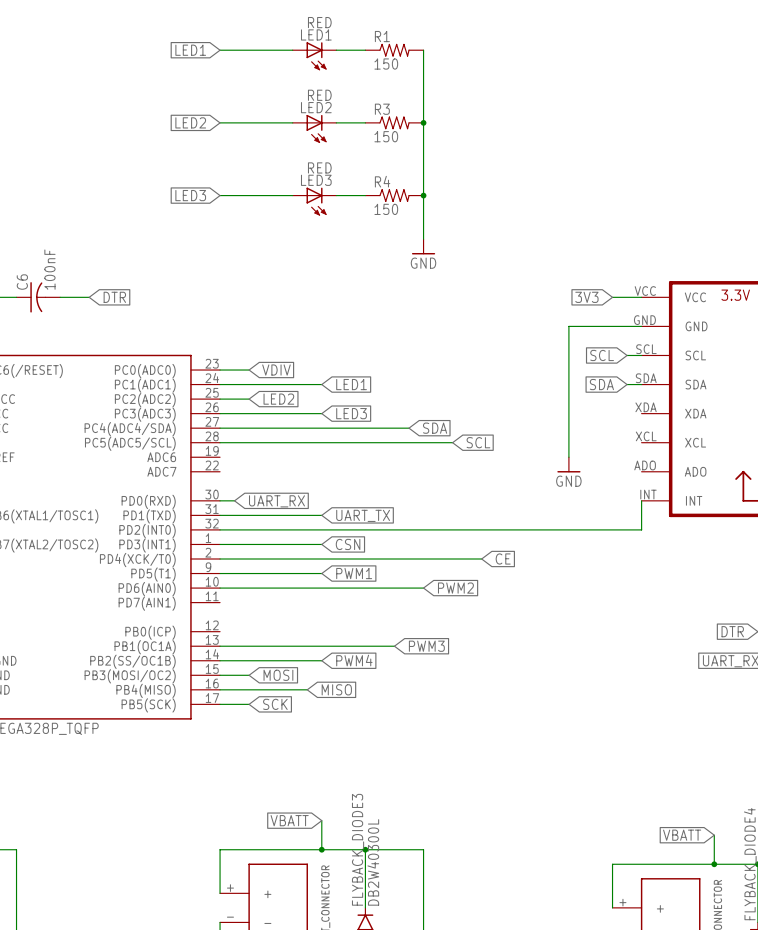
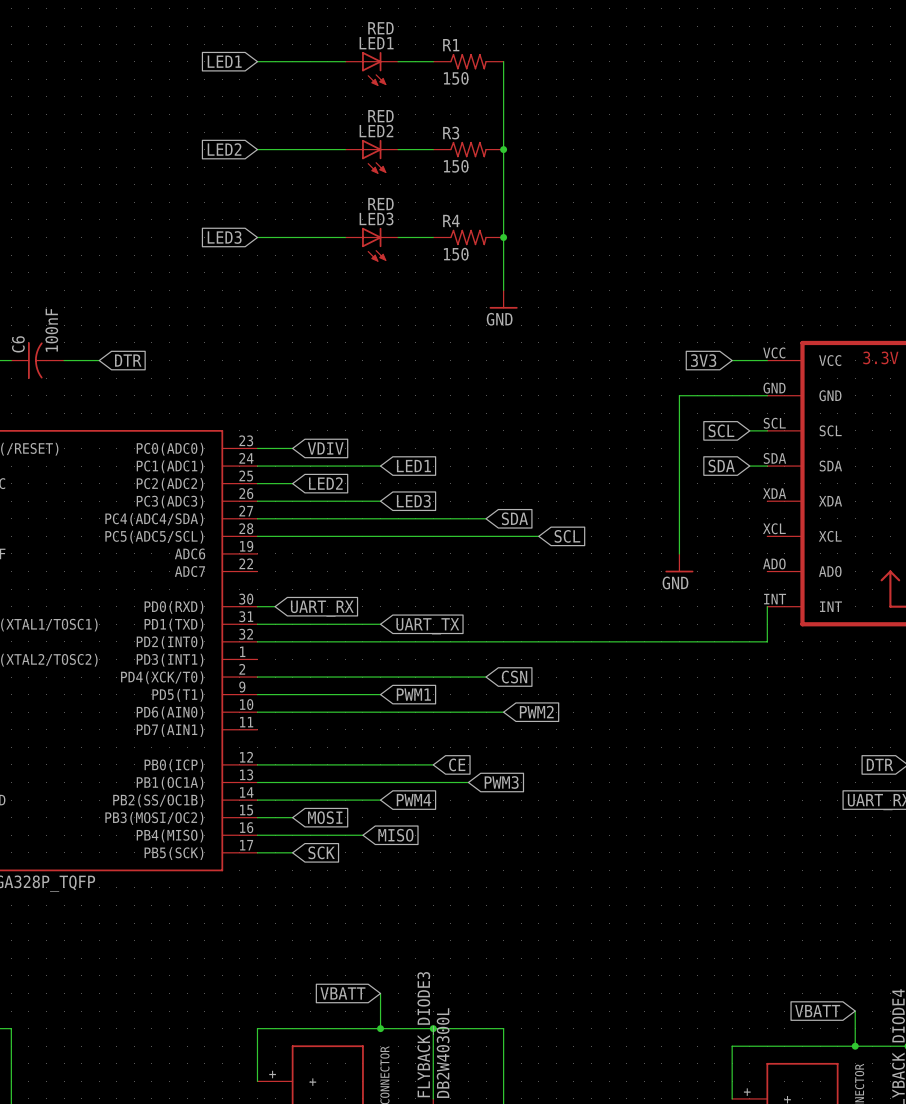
wire: (220, 544) (321, 544) -> none
global label position: CSN (348, 544) -> CSN (514, 677)
wire: (409, 558) (481, 558) -> none
global label position: CE (503, 558) -> CE (457, 764)
wire: none -> (257, 764) (433, 764)

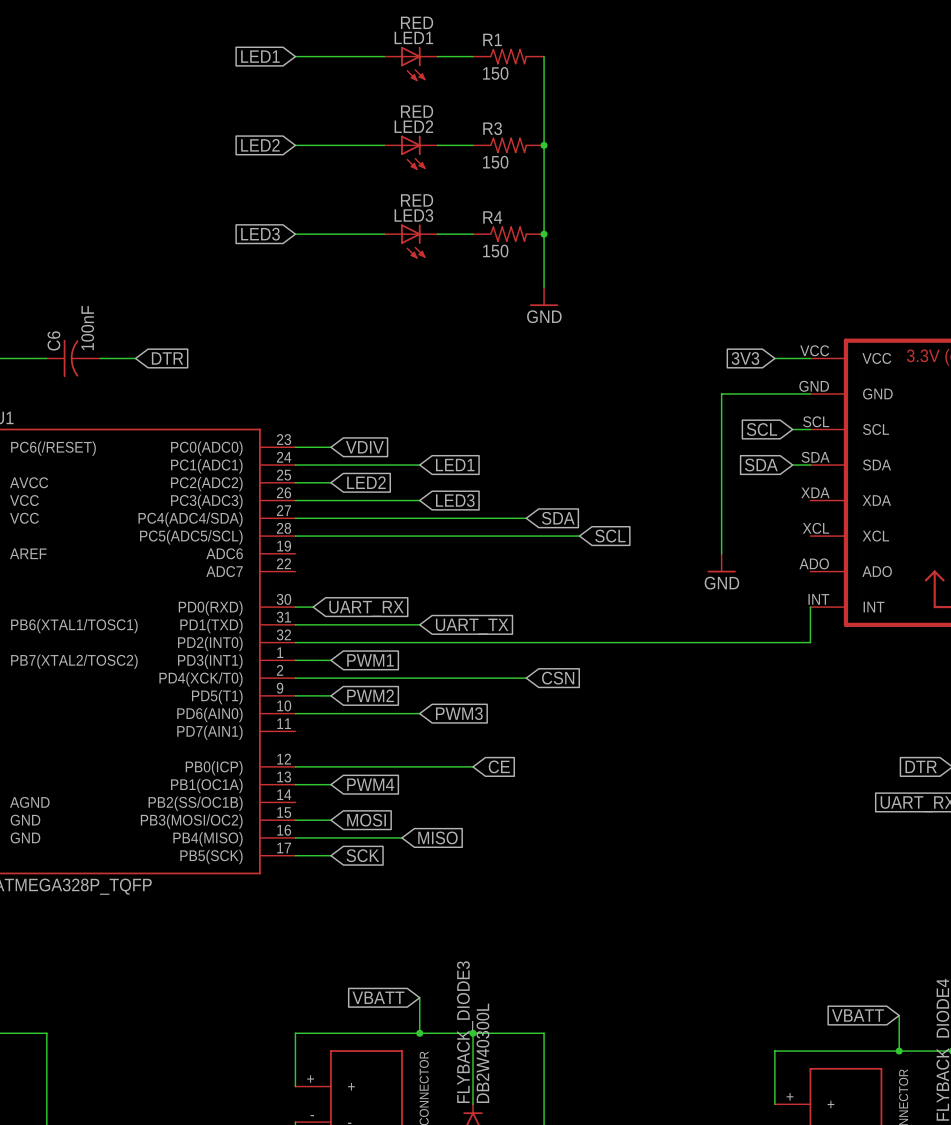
wire: none -> (295, 660) (330, 660)
wire: (292, 694) (380, 694) -> none
global label: none -> PWM2 (370, 695)
global label position: PWM1 (413, 694) -> PWM1 (370, 660)
wire: (380, 712) (503, 712) -> none
global label: PWM2 (536, 712) -> none
wire: (292, 782) (468, 782) -> none
global label position: PWM3 (501, 782) -> PWM3 (459, 713)
wire: (257, 800) (380, 800) -> none
global label position: PWM4 (413, 800) -> PWM4 (370, 784)

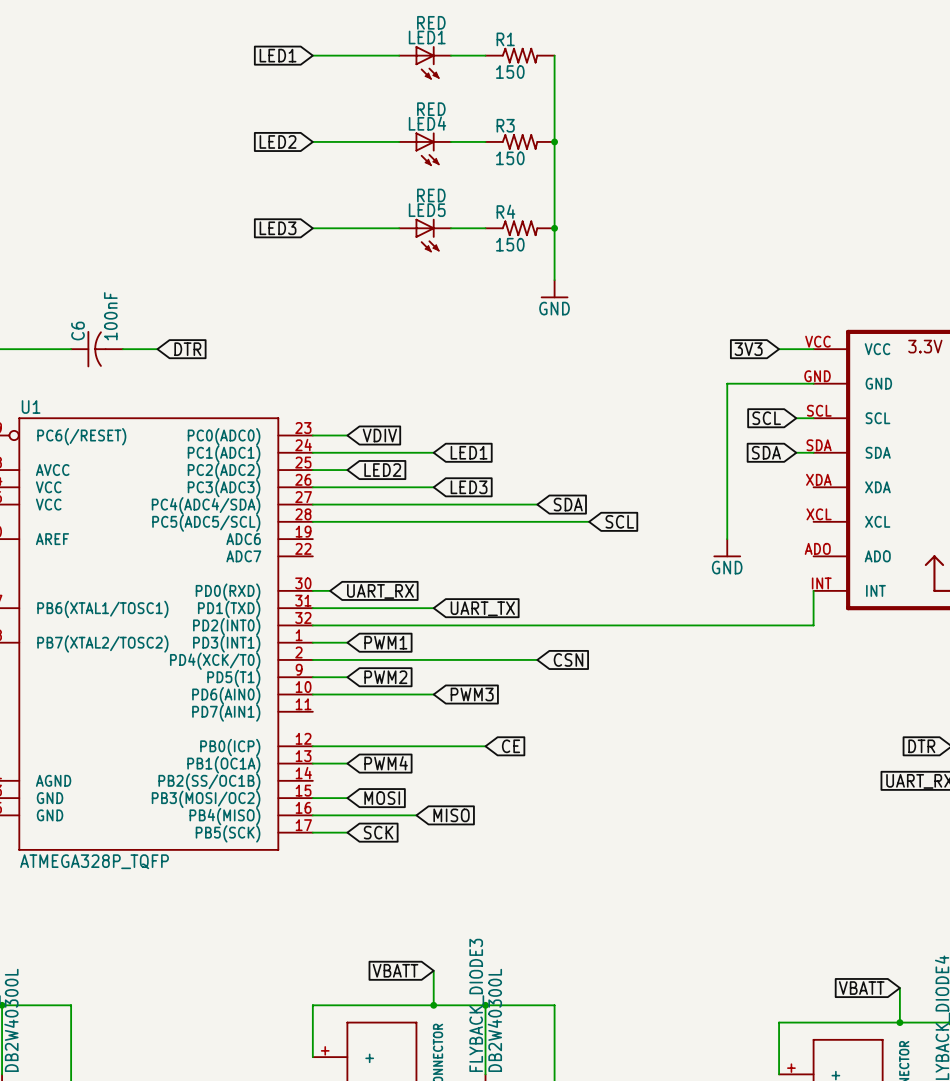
LED2 name: LED2 (413, 126) -> LED4 (427, 123)
LED3 name: LED3 (413, 215) -> LED5 (427, 210)

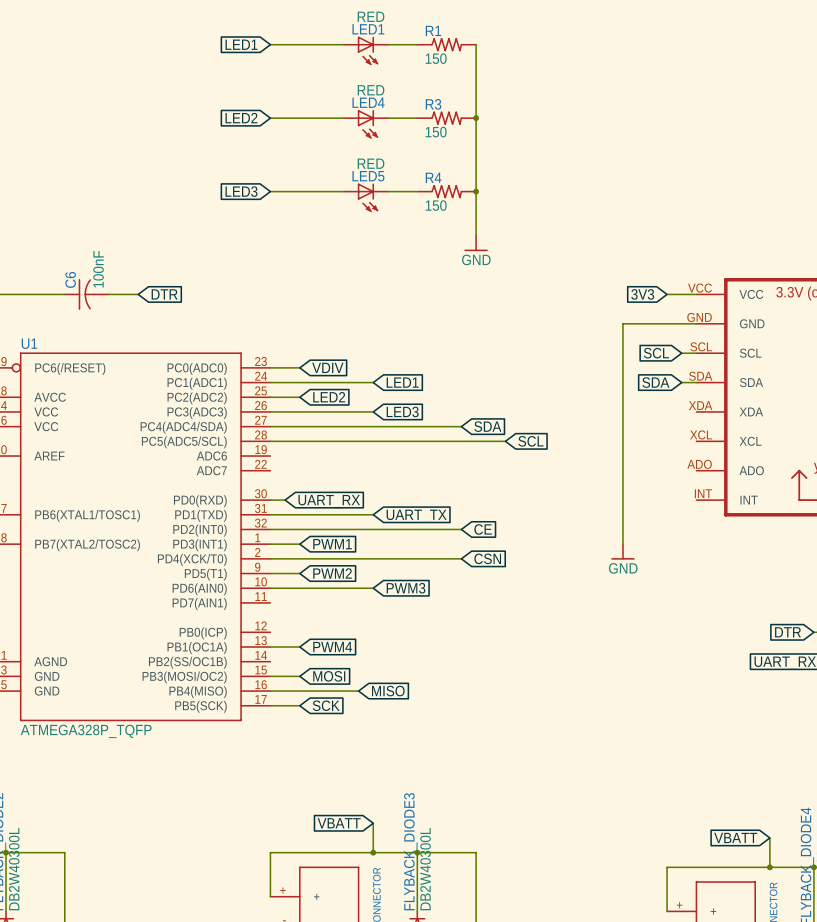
wire: none -> (622, 456) (622, 544)
power symbol position: GND (727, 548) -> GND (622, 551)
wire: (813, 590) (813, 625) (537, 625) -> none
wire: (312, 746) (485, 746) -> none
global label position: CE (511, 746) -> CE (483, 529)

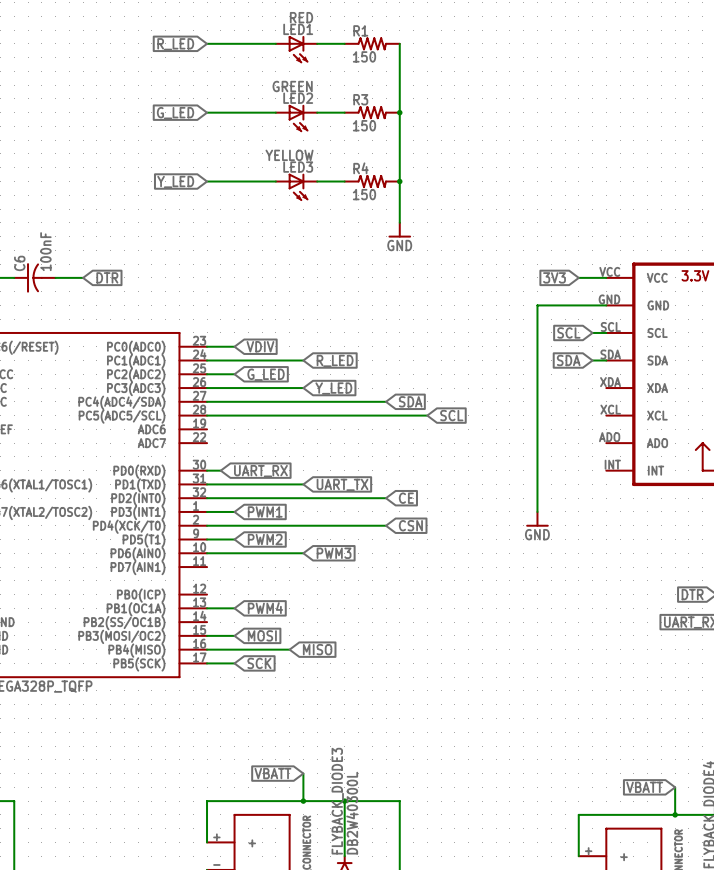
global label: LED1 (241, 44) -> R_LED (175, 44)
LED4 value: RED (371, 90) -> GREEN (292, 86)
LED4 name: LED4 (368, 102) -> LED2 (298, 98)
global label: LED2 (241, 118) -> G_LED (175, 113)
LED5 value: RED (371, 163) -> YELLOW (289, 155)
LED5 name: LED5 (368, 176) -> LED3 (298, 167)
global label: LED3 (241, 191) -> Y_LED (175, 181)
global label: LED1 (402, 382) -> R_LED (335, 360)
global label: LED2 (329, 397) -> G_LED (266, 374)
global label: LED3 (402, 411) -> Y_LED (333, 388)

